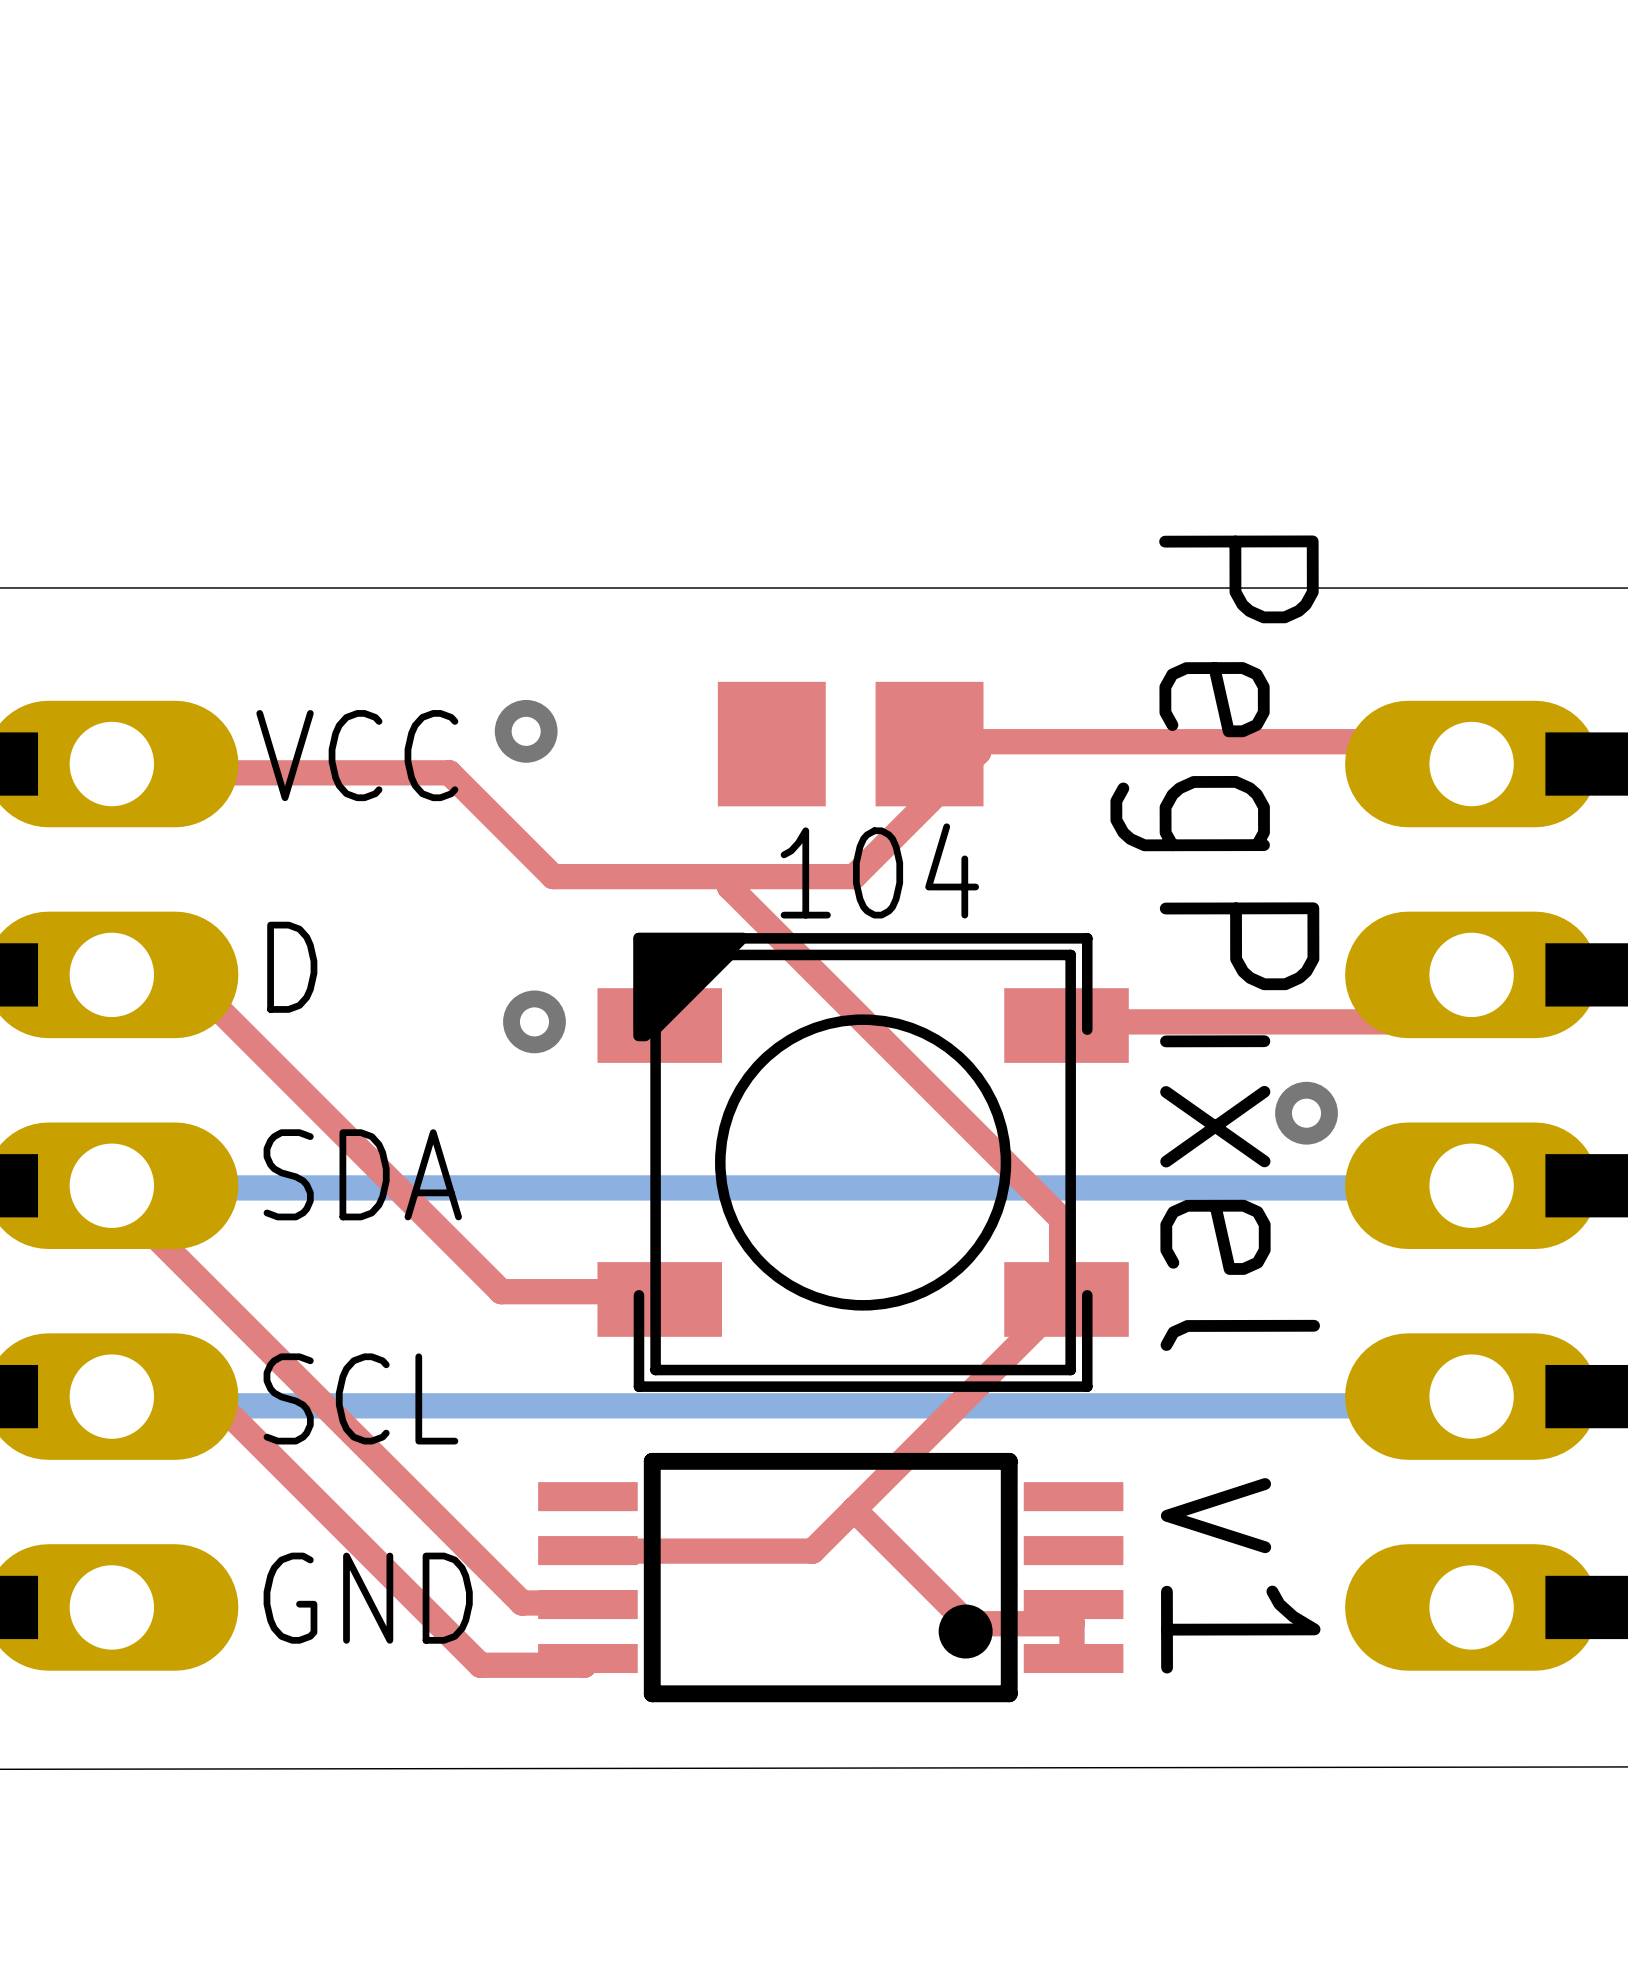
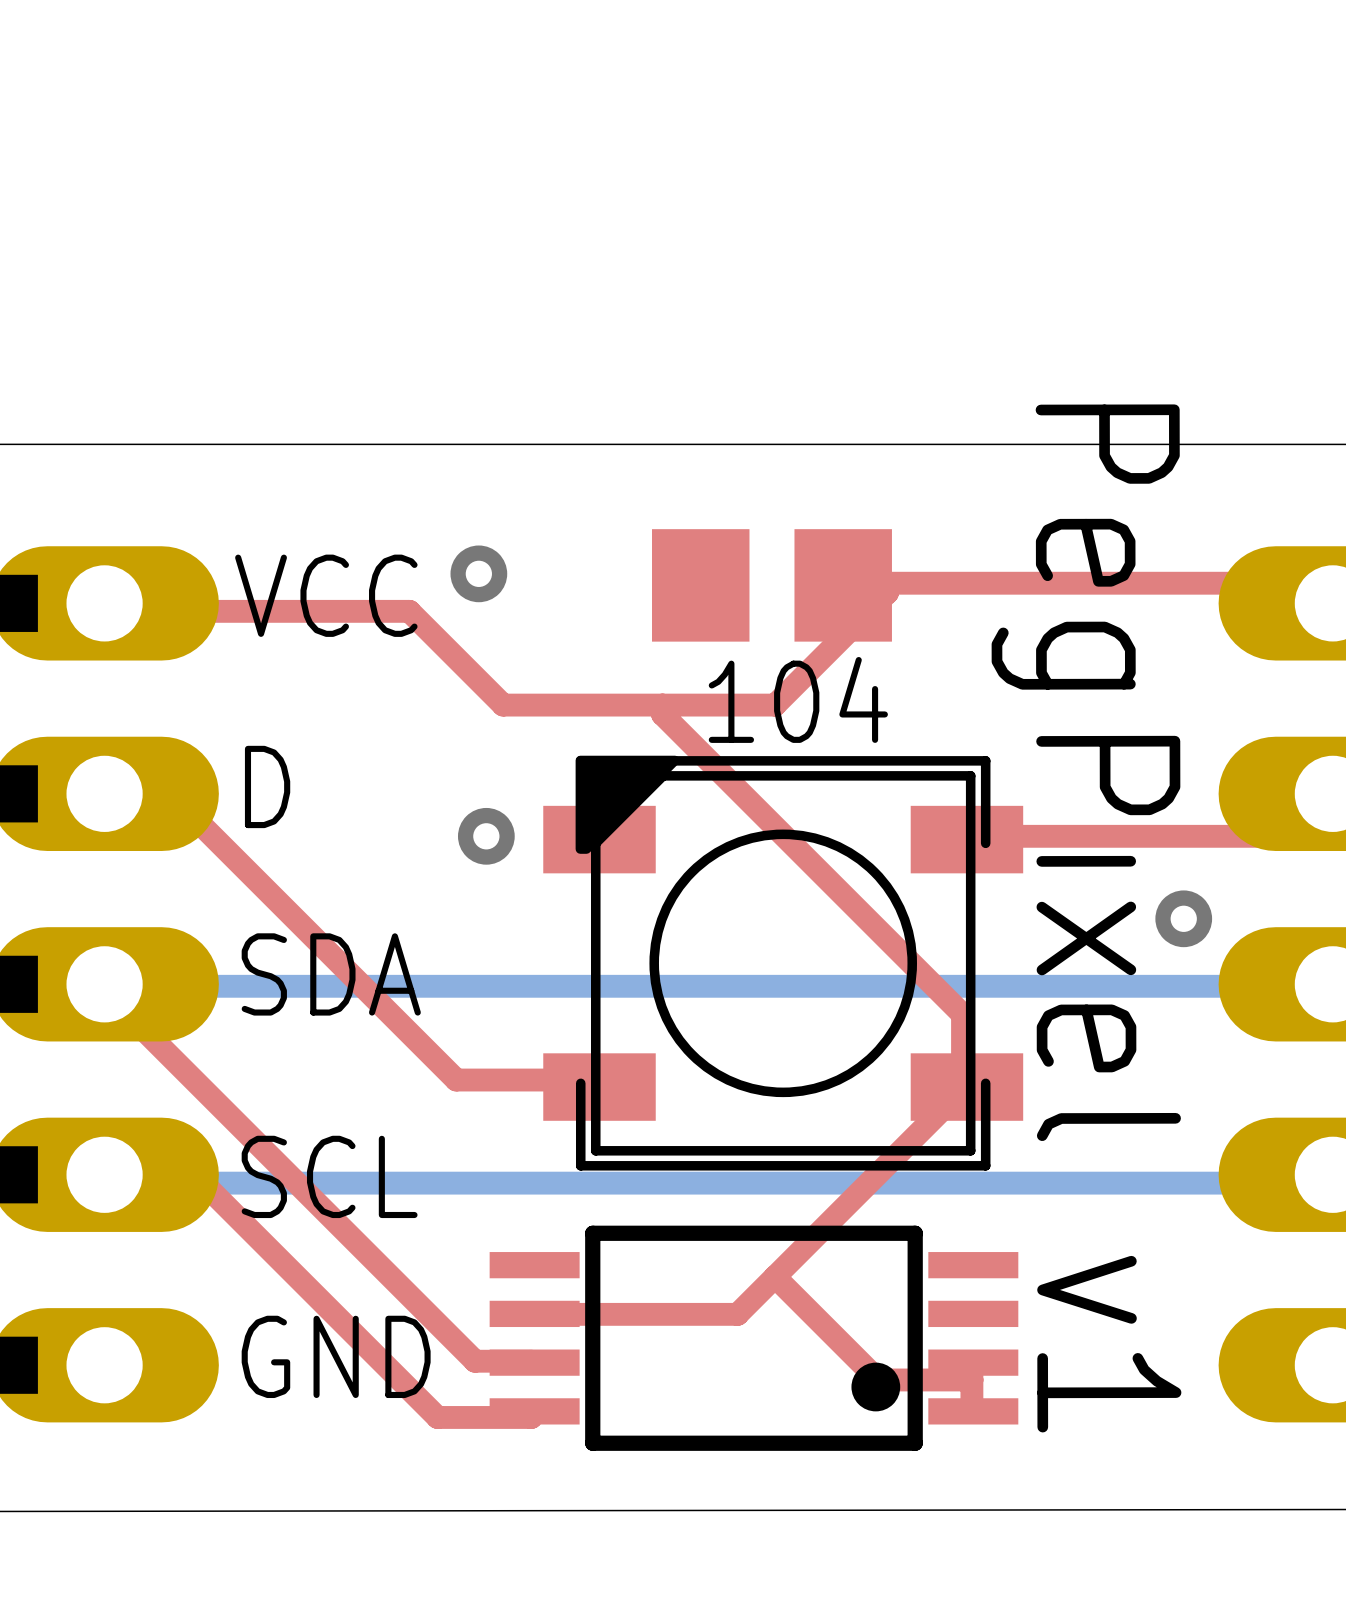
text position: PegPıxel v1 (1215, 1104) -> PegPıxel v1 (1086, 918)

